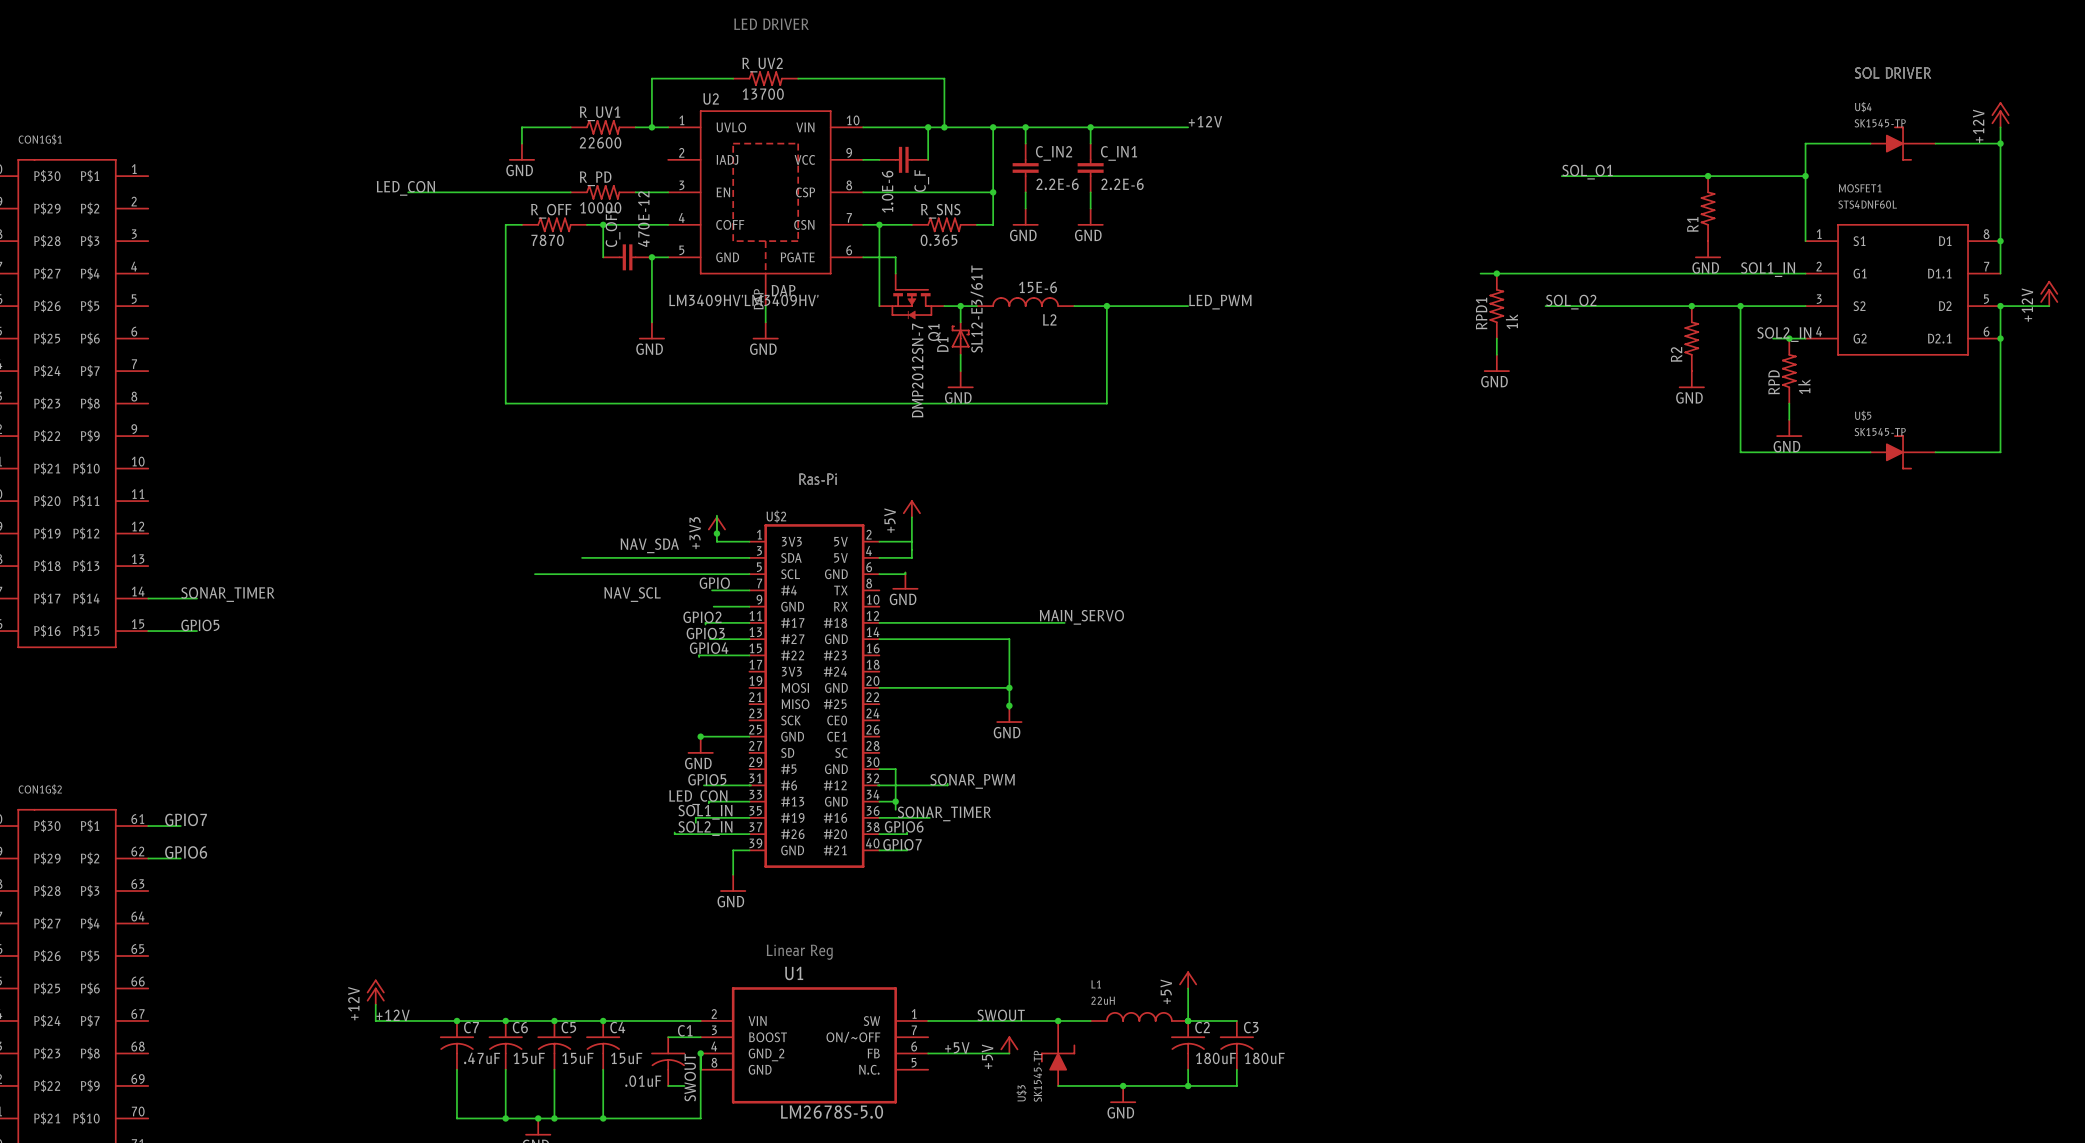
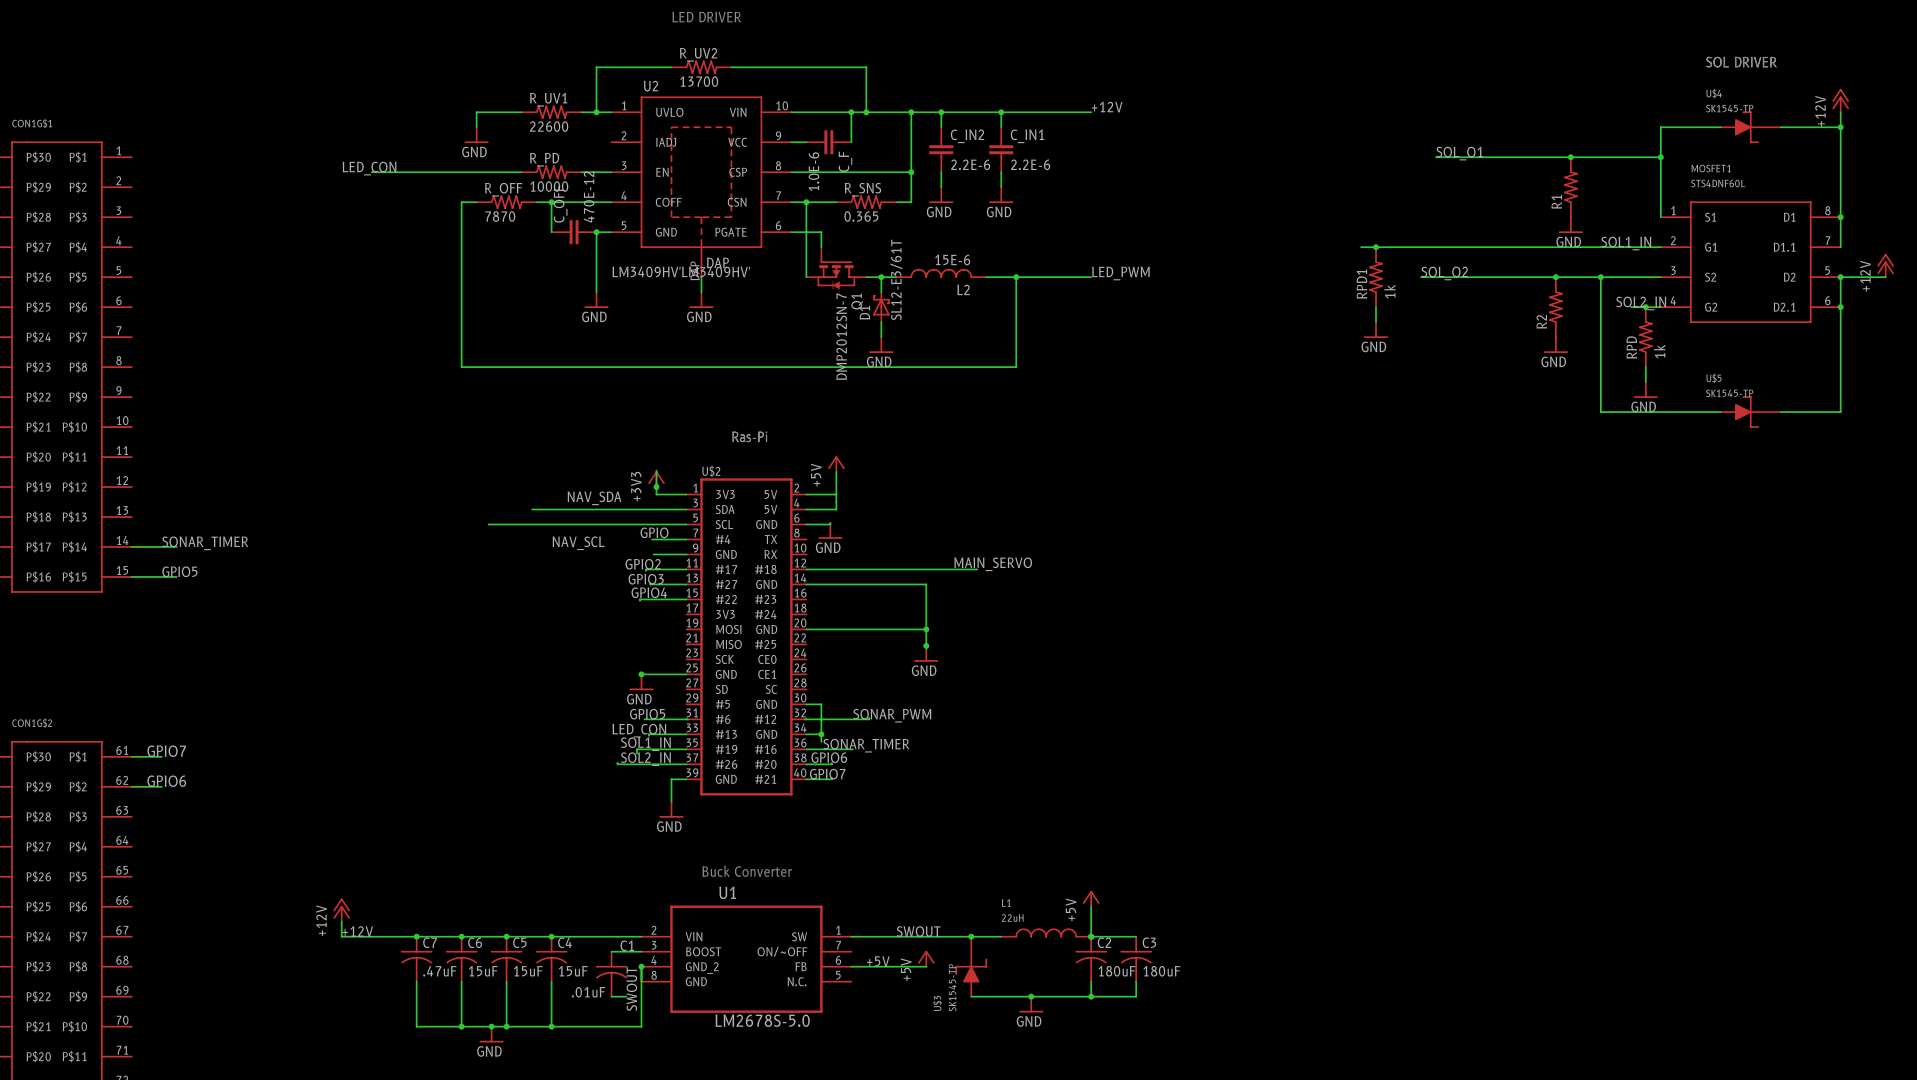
text: Linear Reg (799, 952) -> Buck Converter (747, 871)

